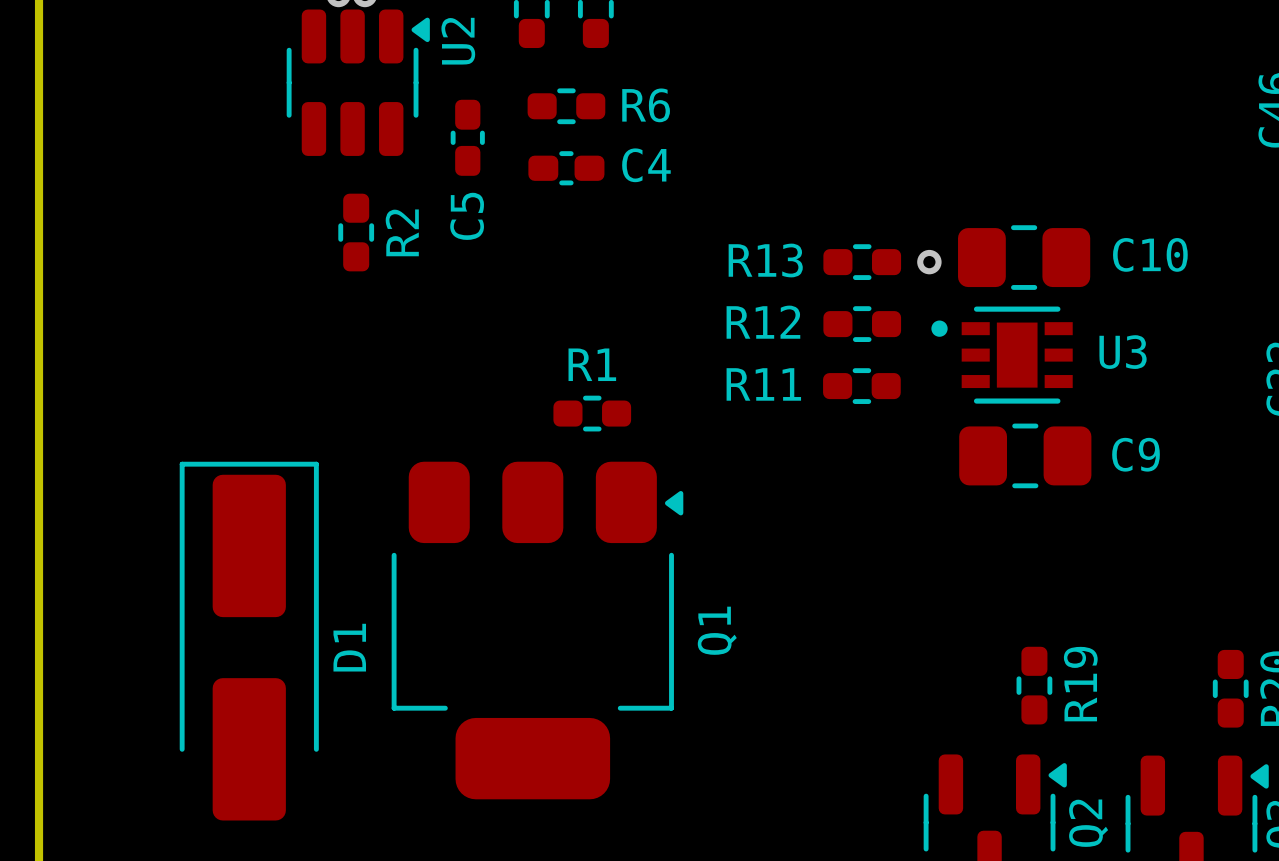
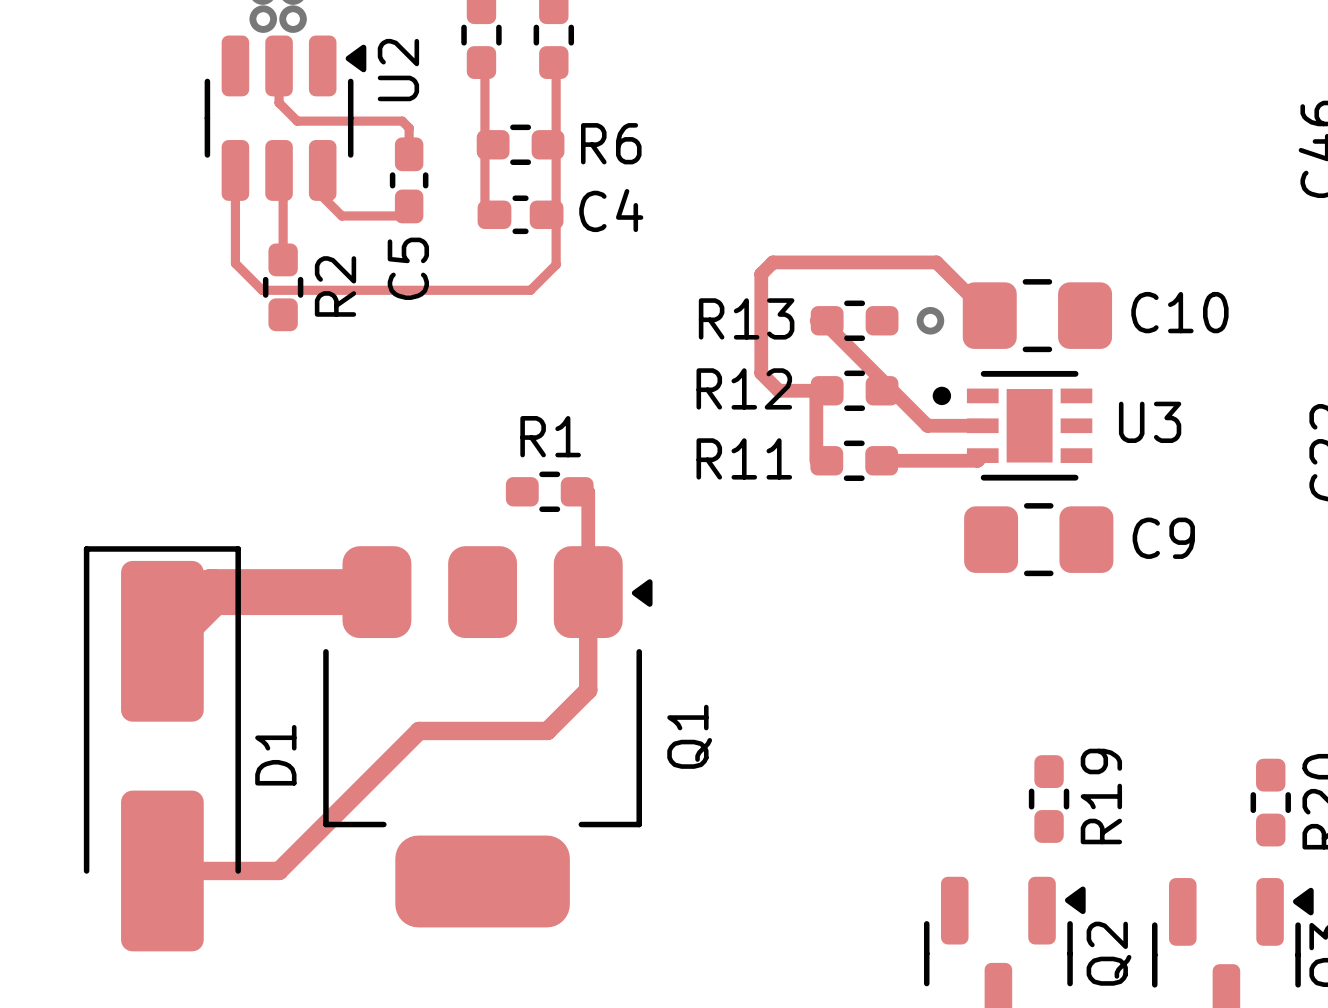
track: none -> (279, 65) (279, 102) (297, 121) (402, 121) (409, 127) (409, 144)
track: none -> (481, 73) (484, 76) (484, 214)
track: none -> (553, 73) (556, 75) (556, 264) (530, 290) (262, 290) (235, 263) (235, 170)
track: none -> (279, 170) (283, 174) (283, 249)
track: none -> (322, 170) (322, 196) (341, 215) (409, 215)
track: none -> (989, 290) (989, 315) (936, 262) (772, 262) (761, 274) (761, 373) (778, 390) (816, 390)
track: none -> (816, 320) (822, 320) (927, 425) (982, 425)
track: none -> (816, 391) (816, 460)
track: none -> (982, 455) (977, 460) (892, 460)
track: none -> (588, 492) (588, 690) (547, 730) (419, 730) (279, 870) (162, 870)
track: none -> (376, 592) (211, 592) (162, 641)

